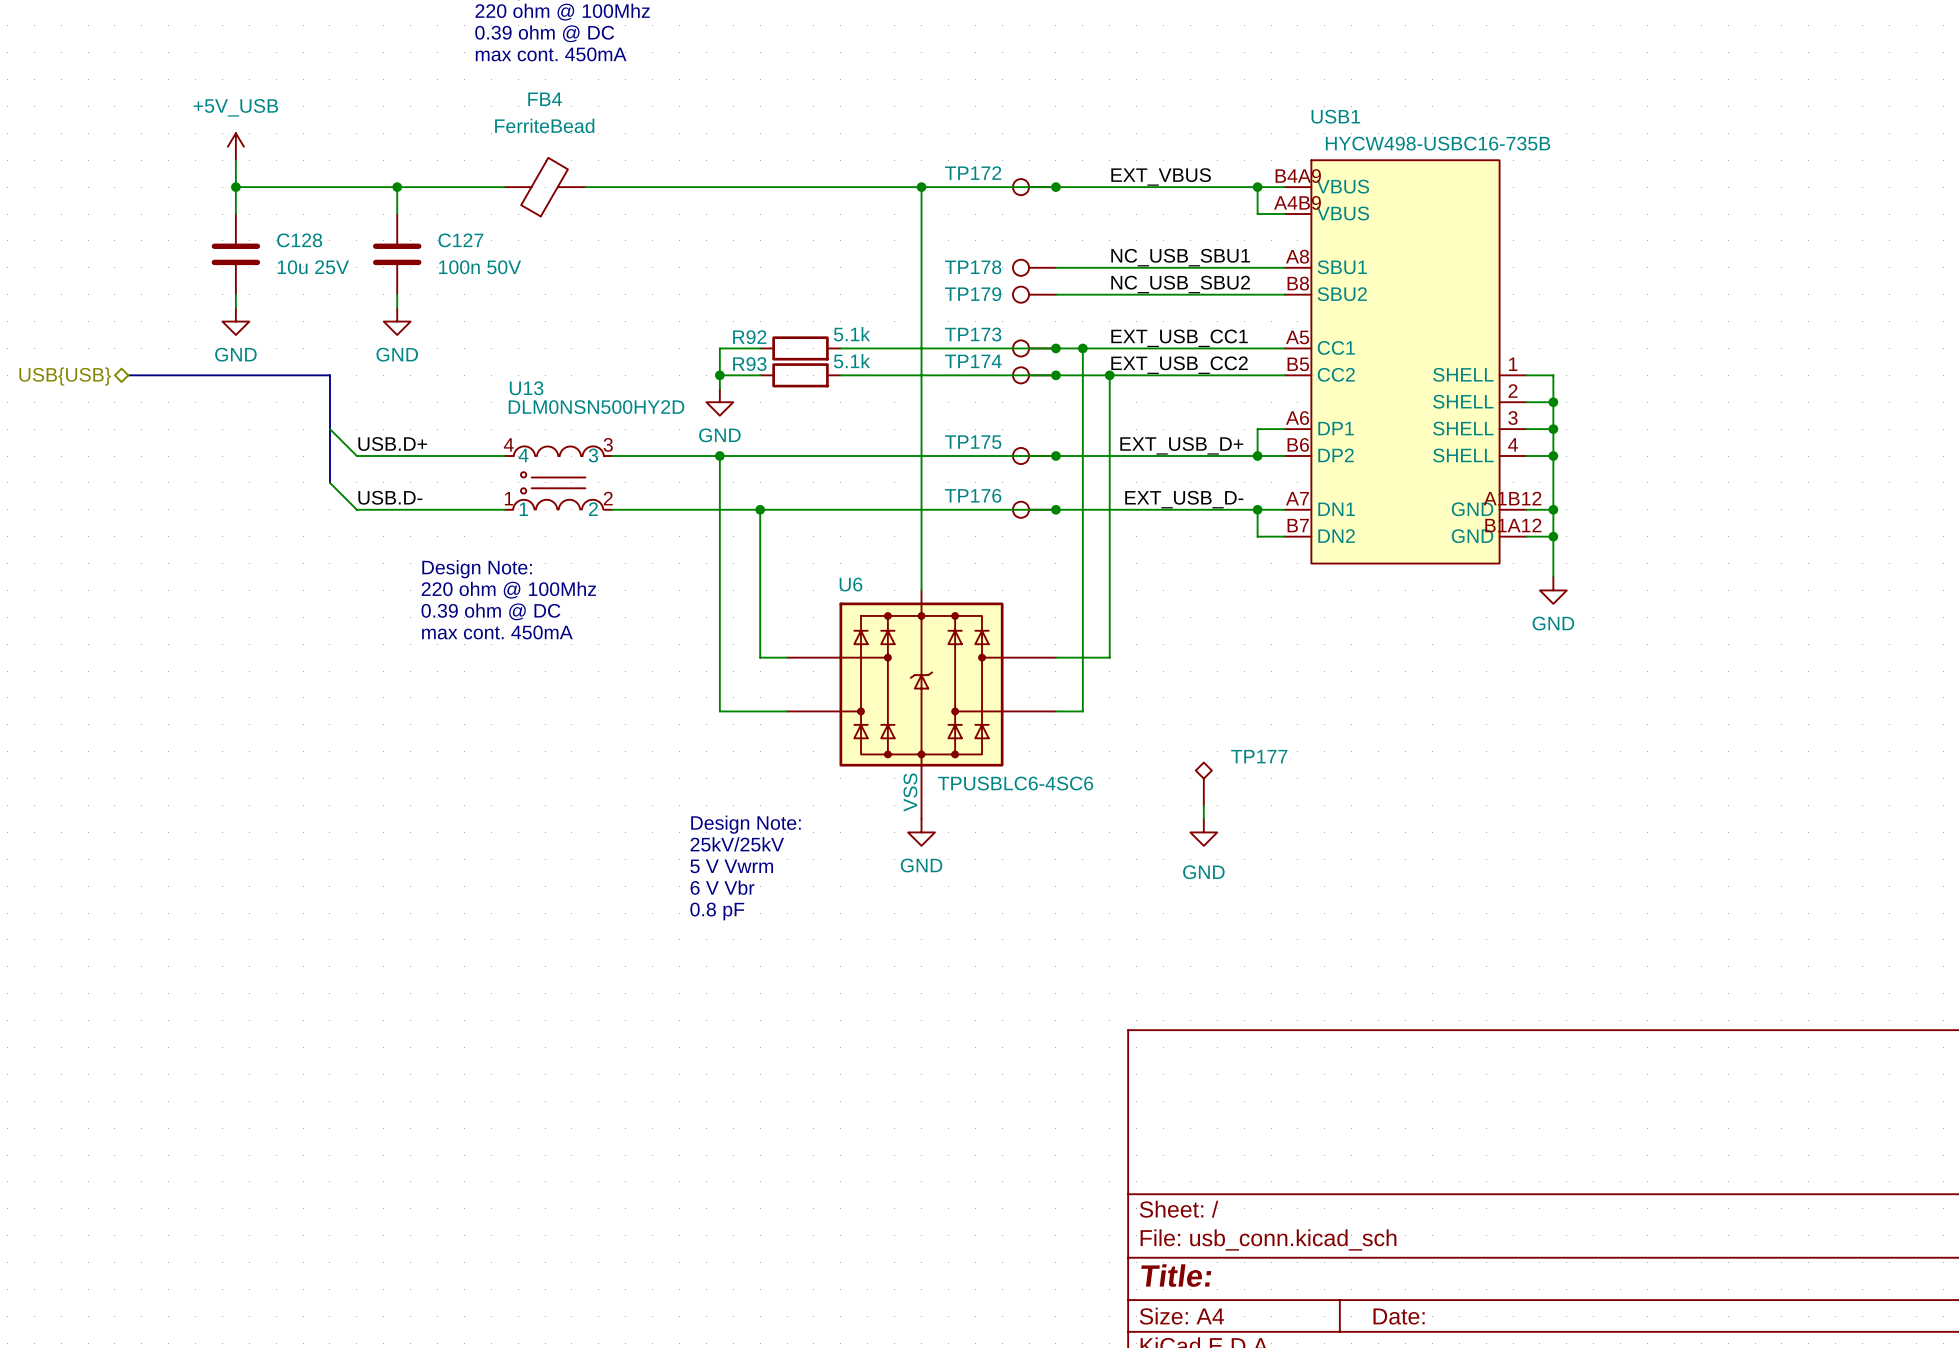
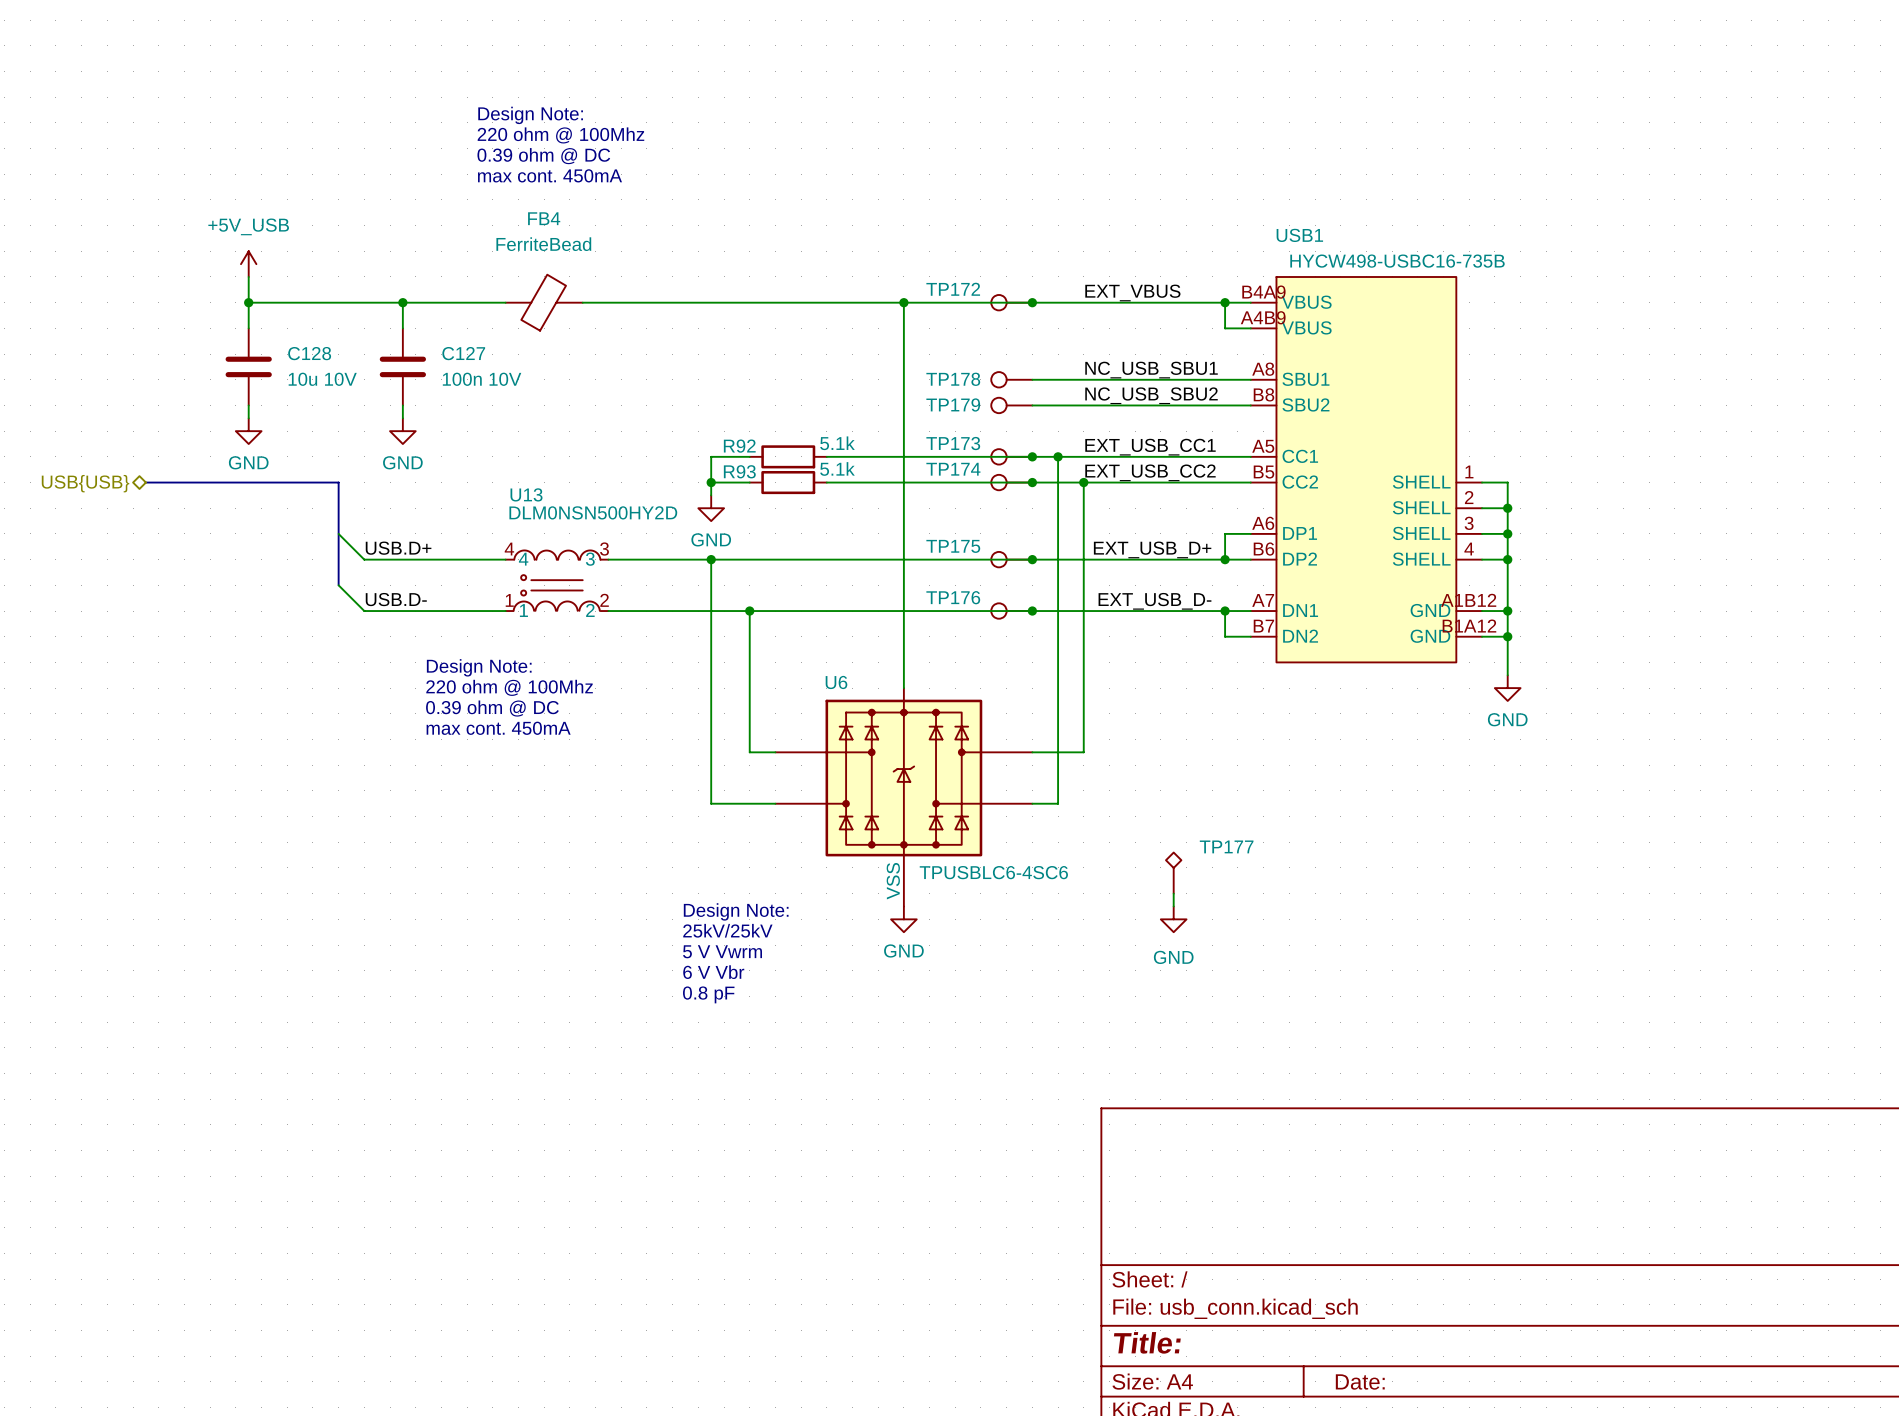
C128 value: 10u 25V (313, 267) -> 10u 10V (322, 379)
C127 value: 100n 50V (480, 267) -> 100n 10V (482, 379)

